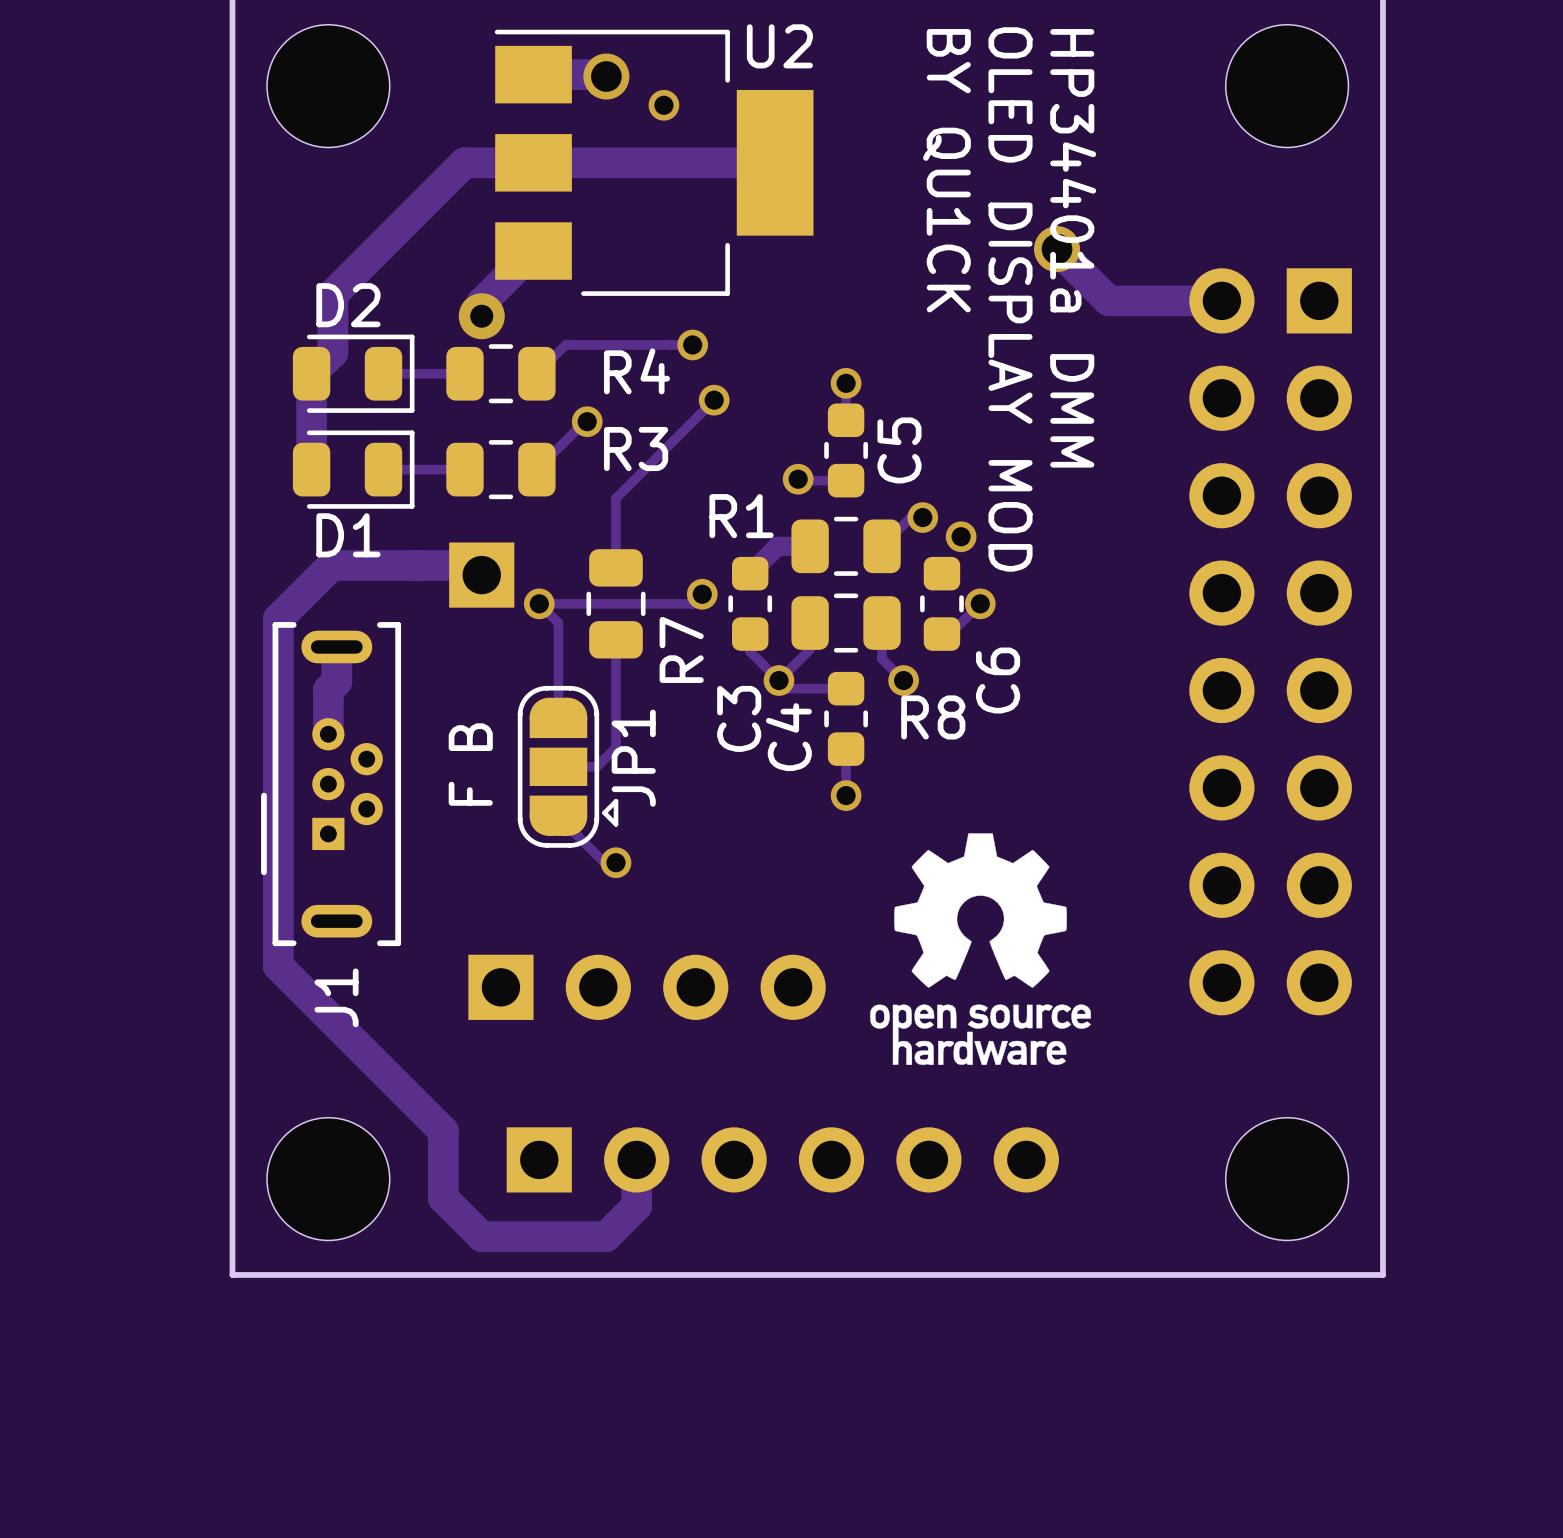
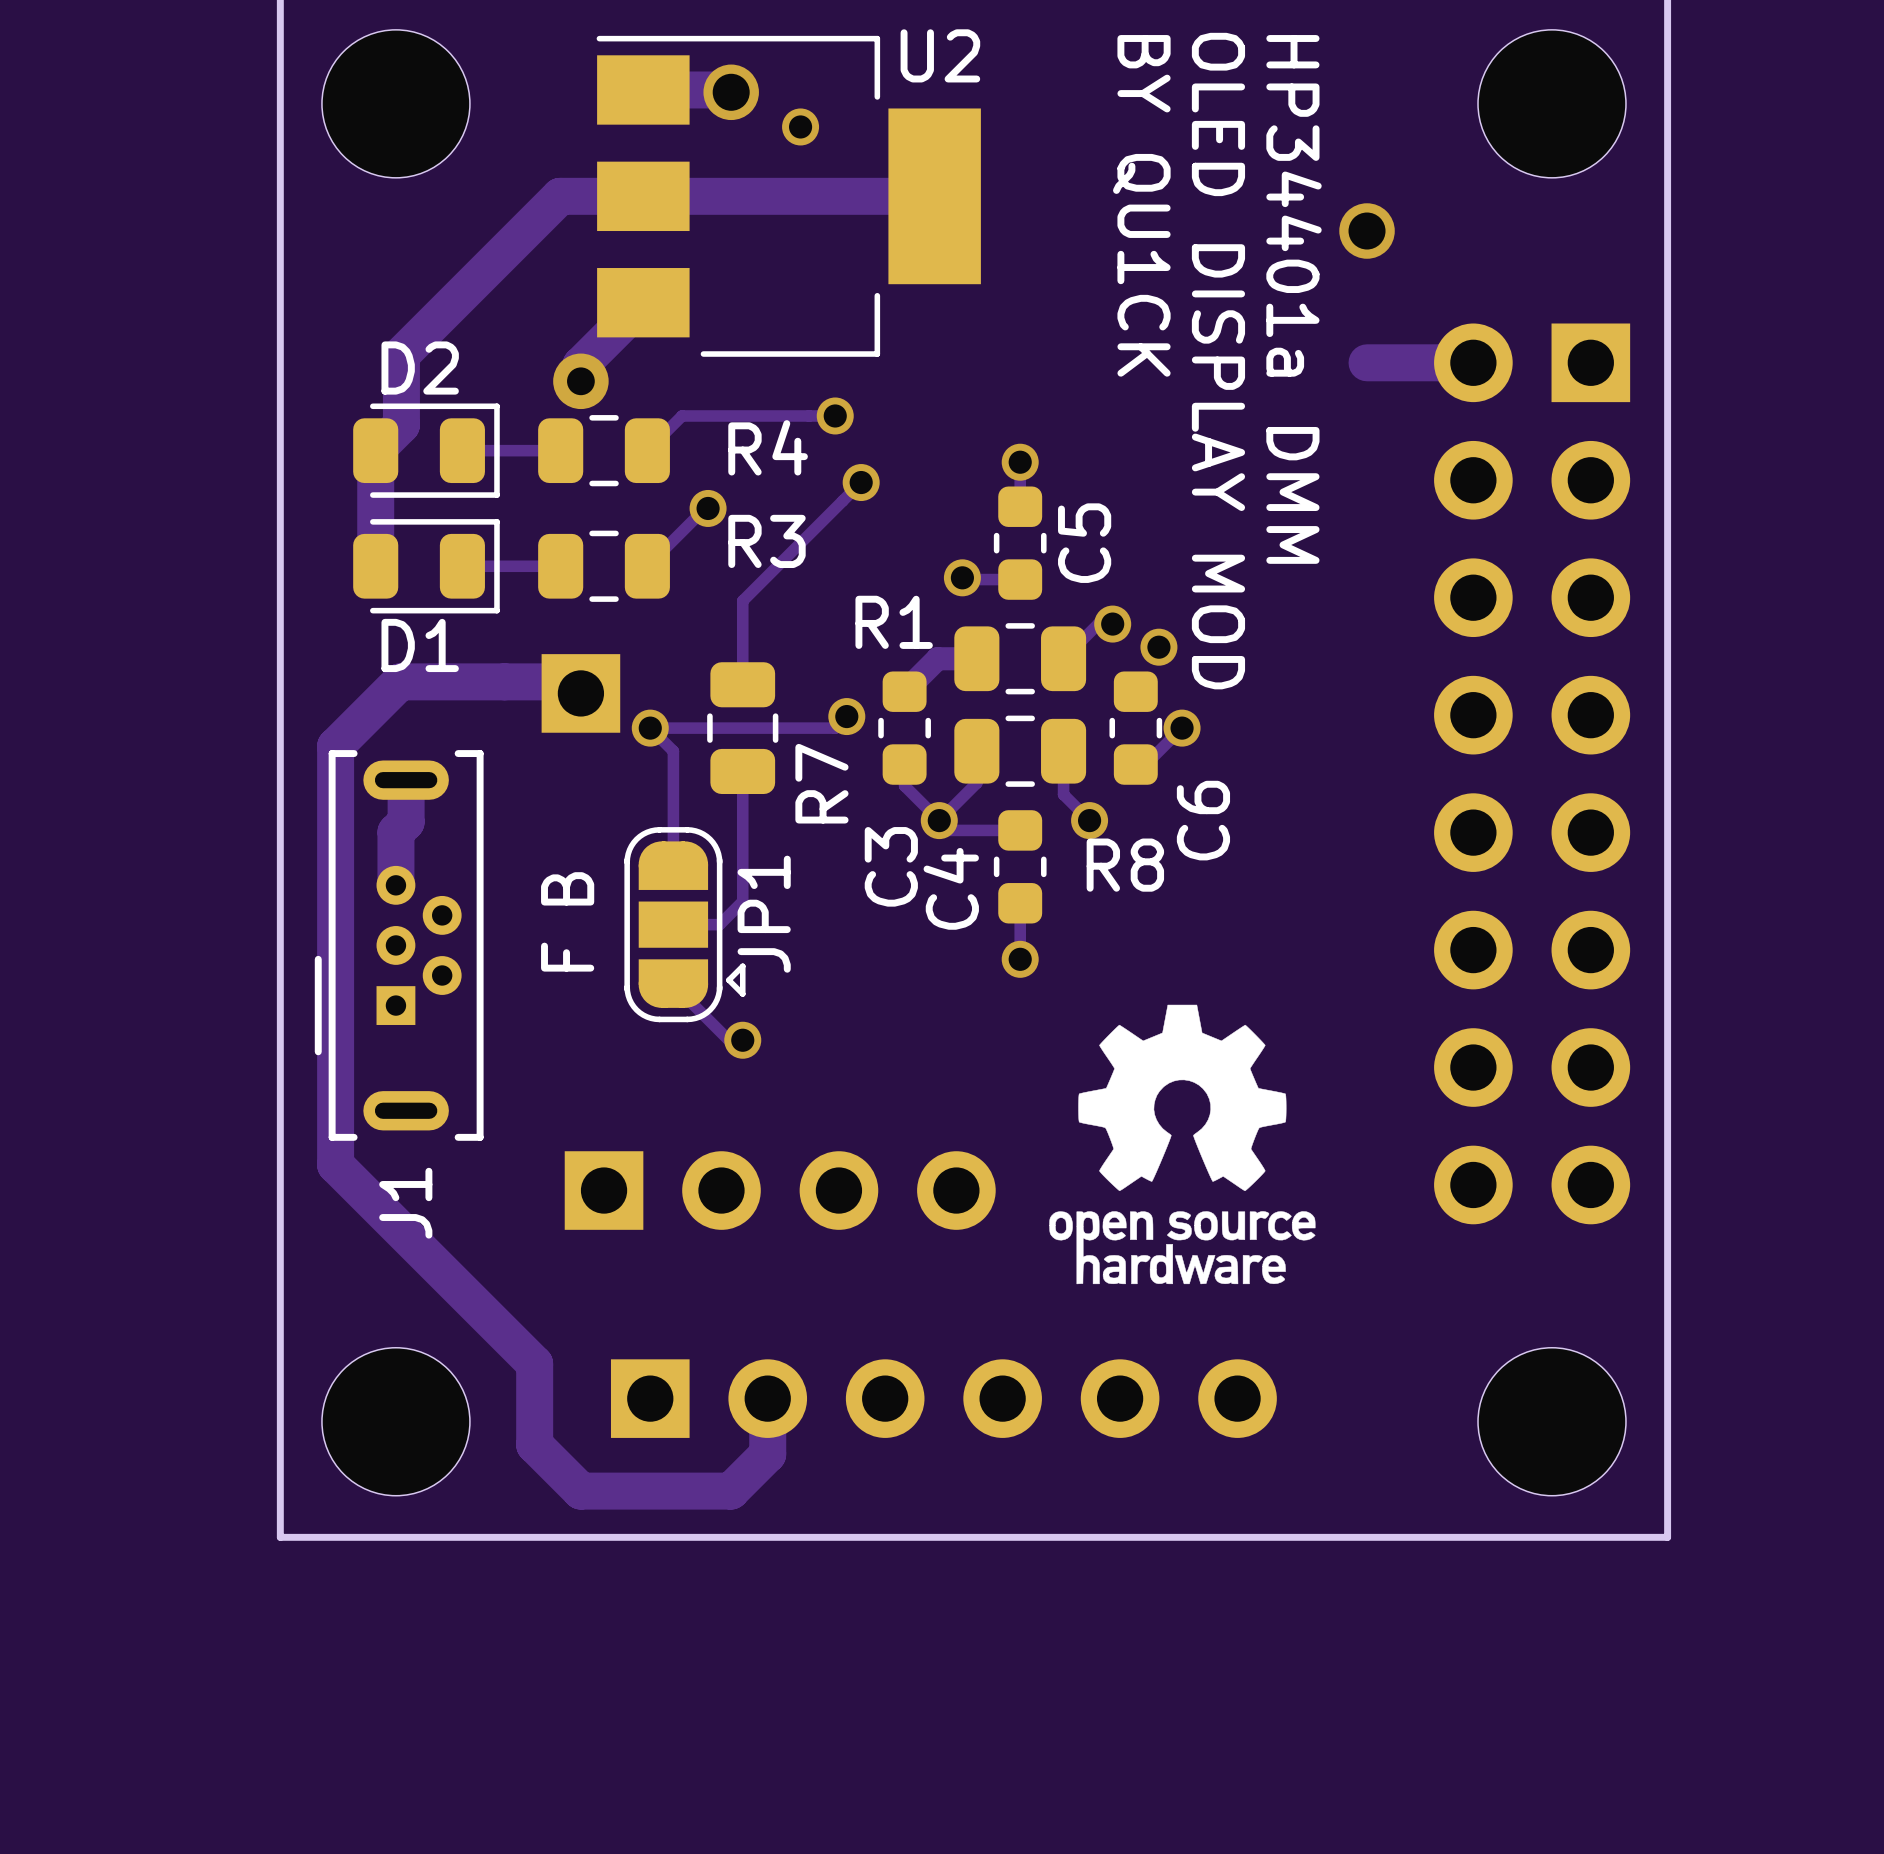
track: (1057, 249) (1108, 300) (1133, 300) -> none
via position: (1057, 249) -> (1367, 231)

